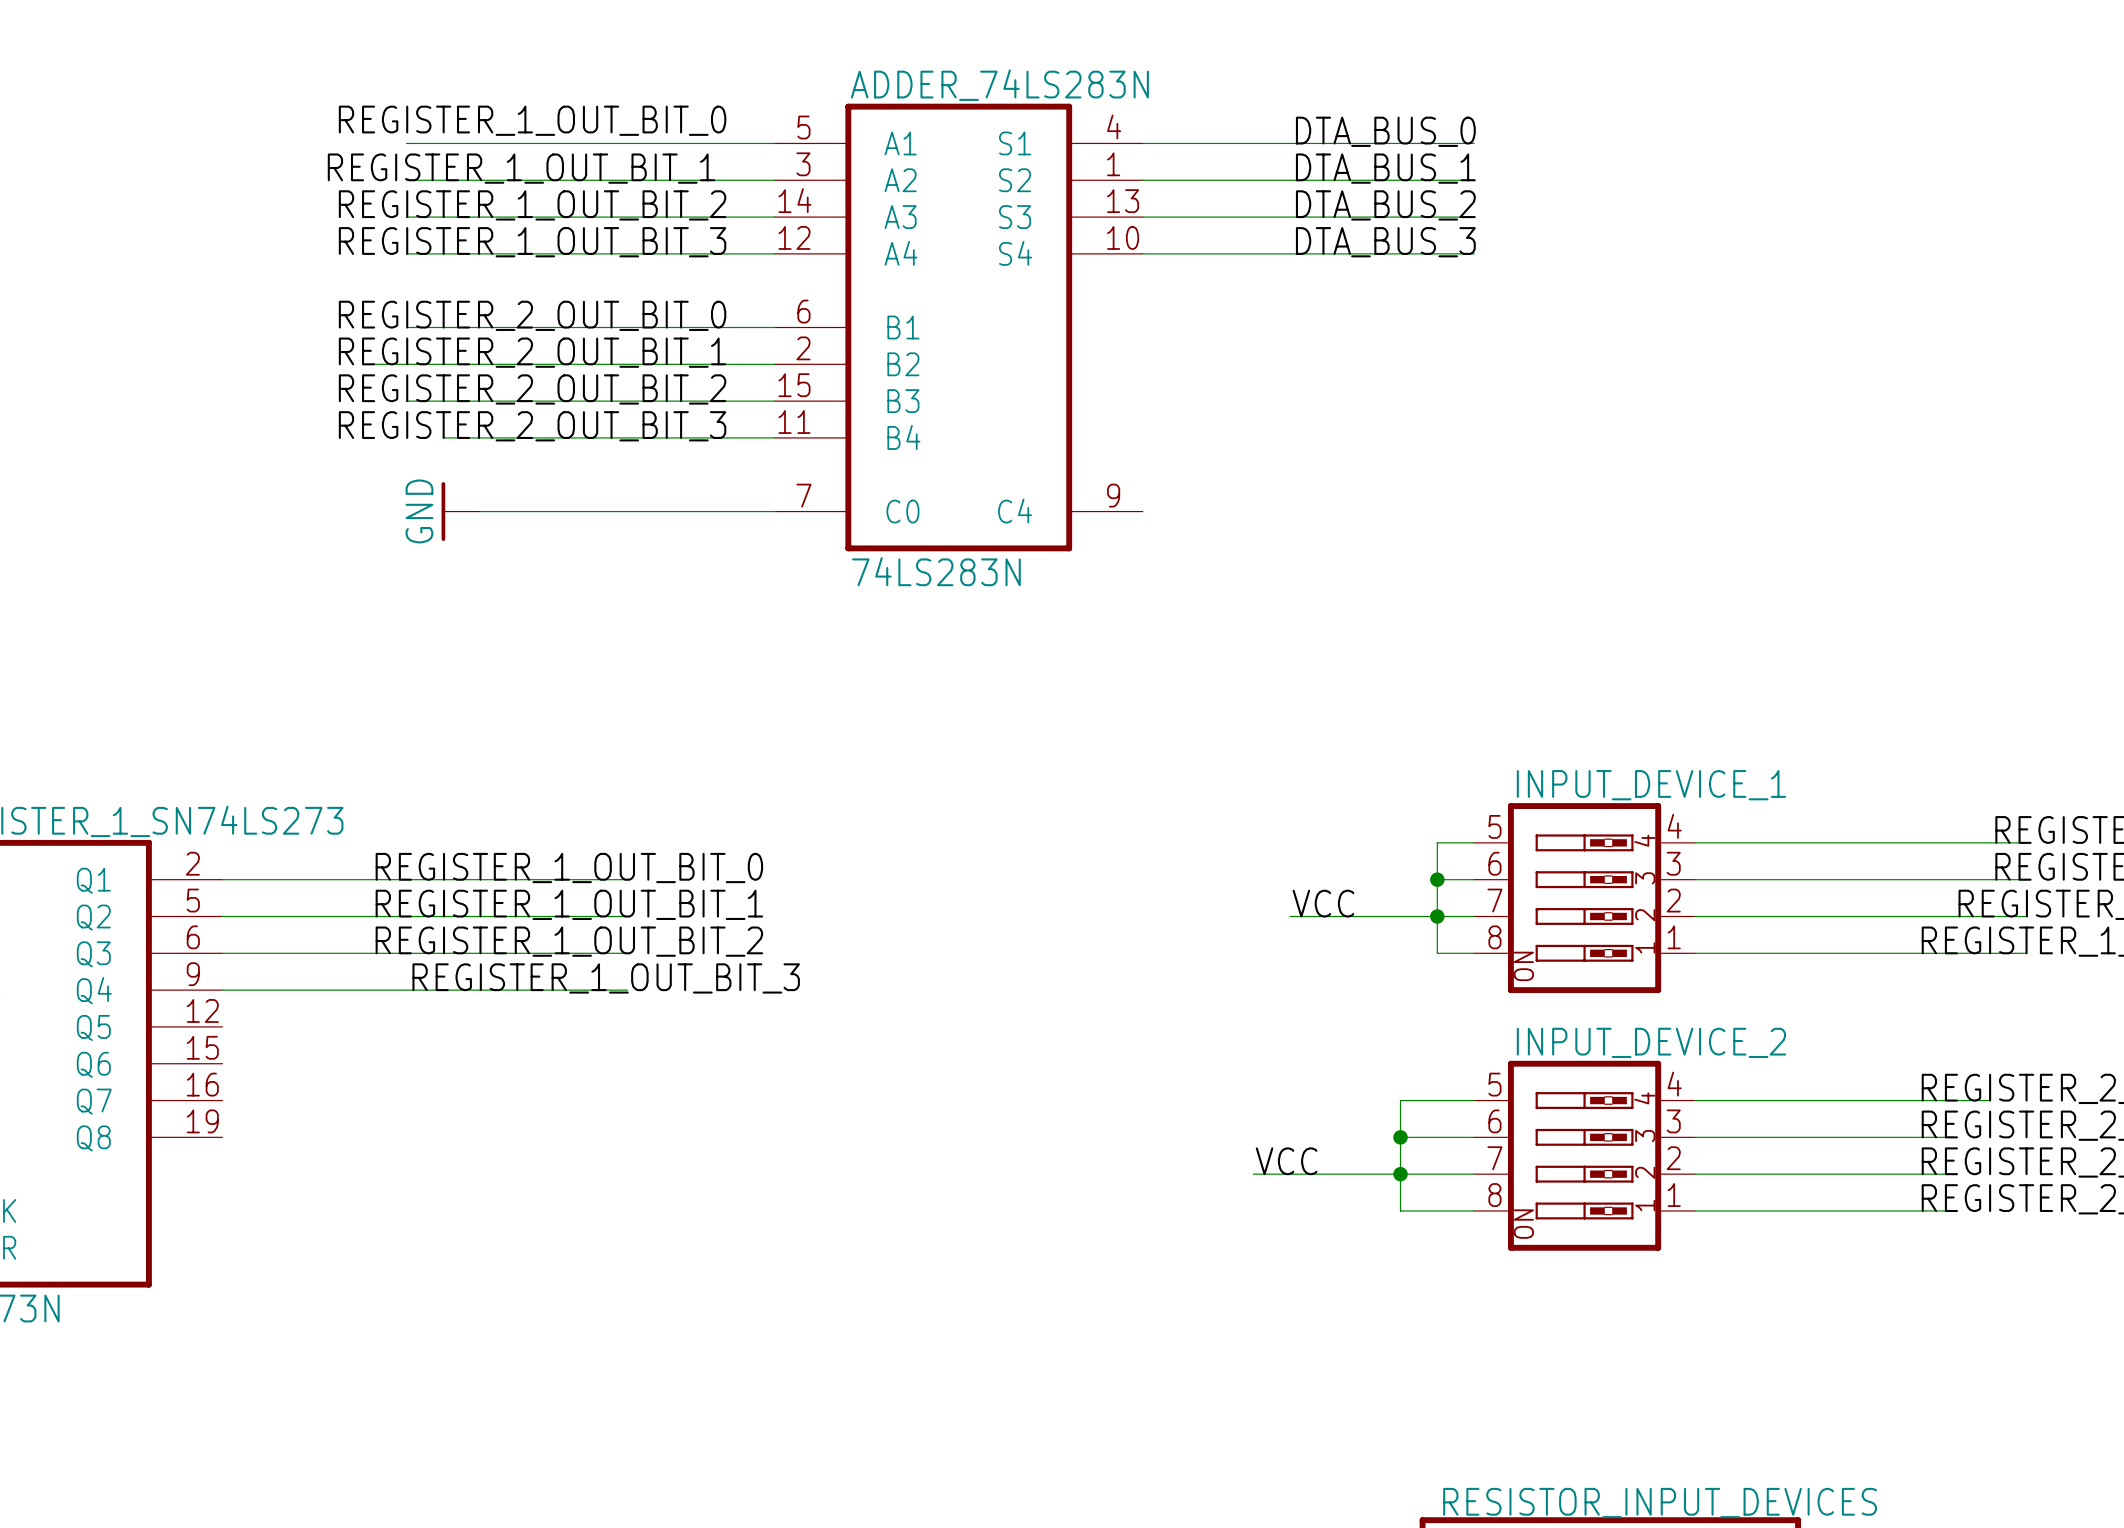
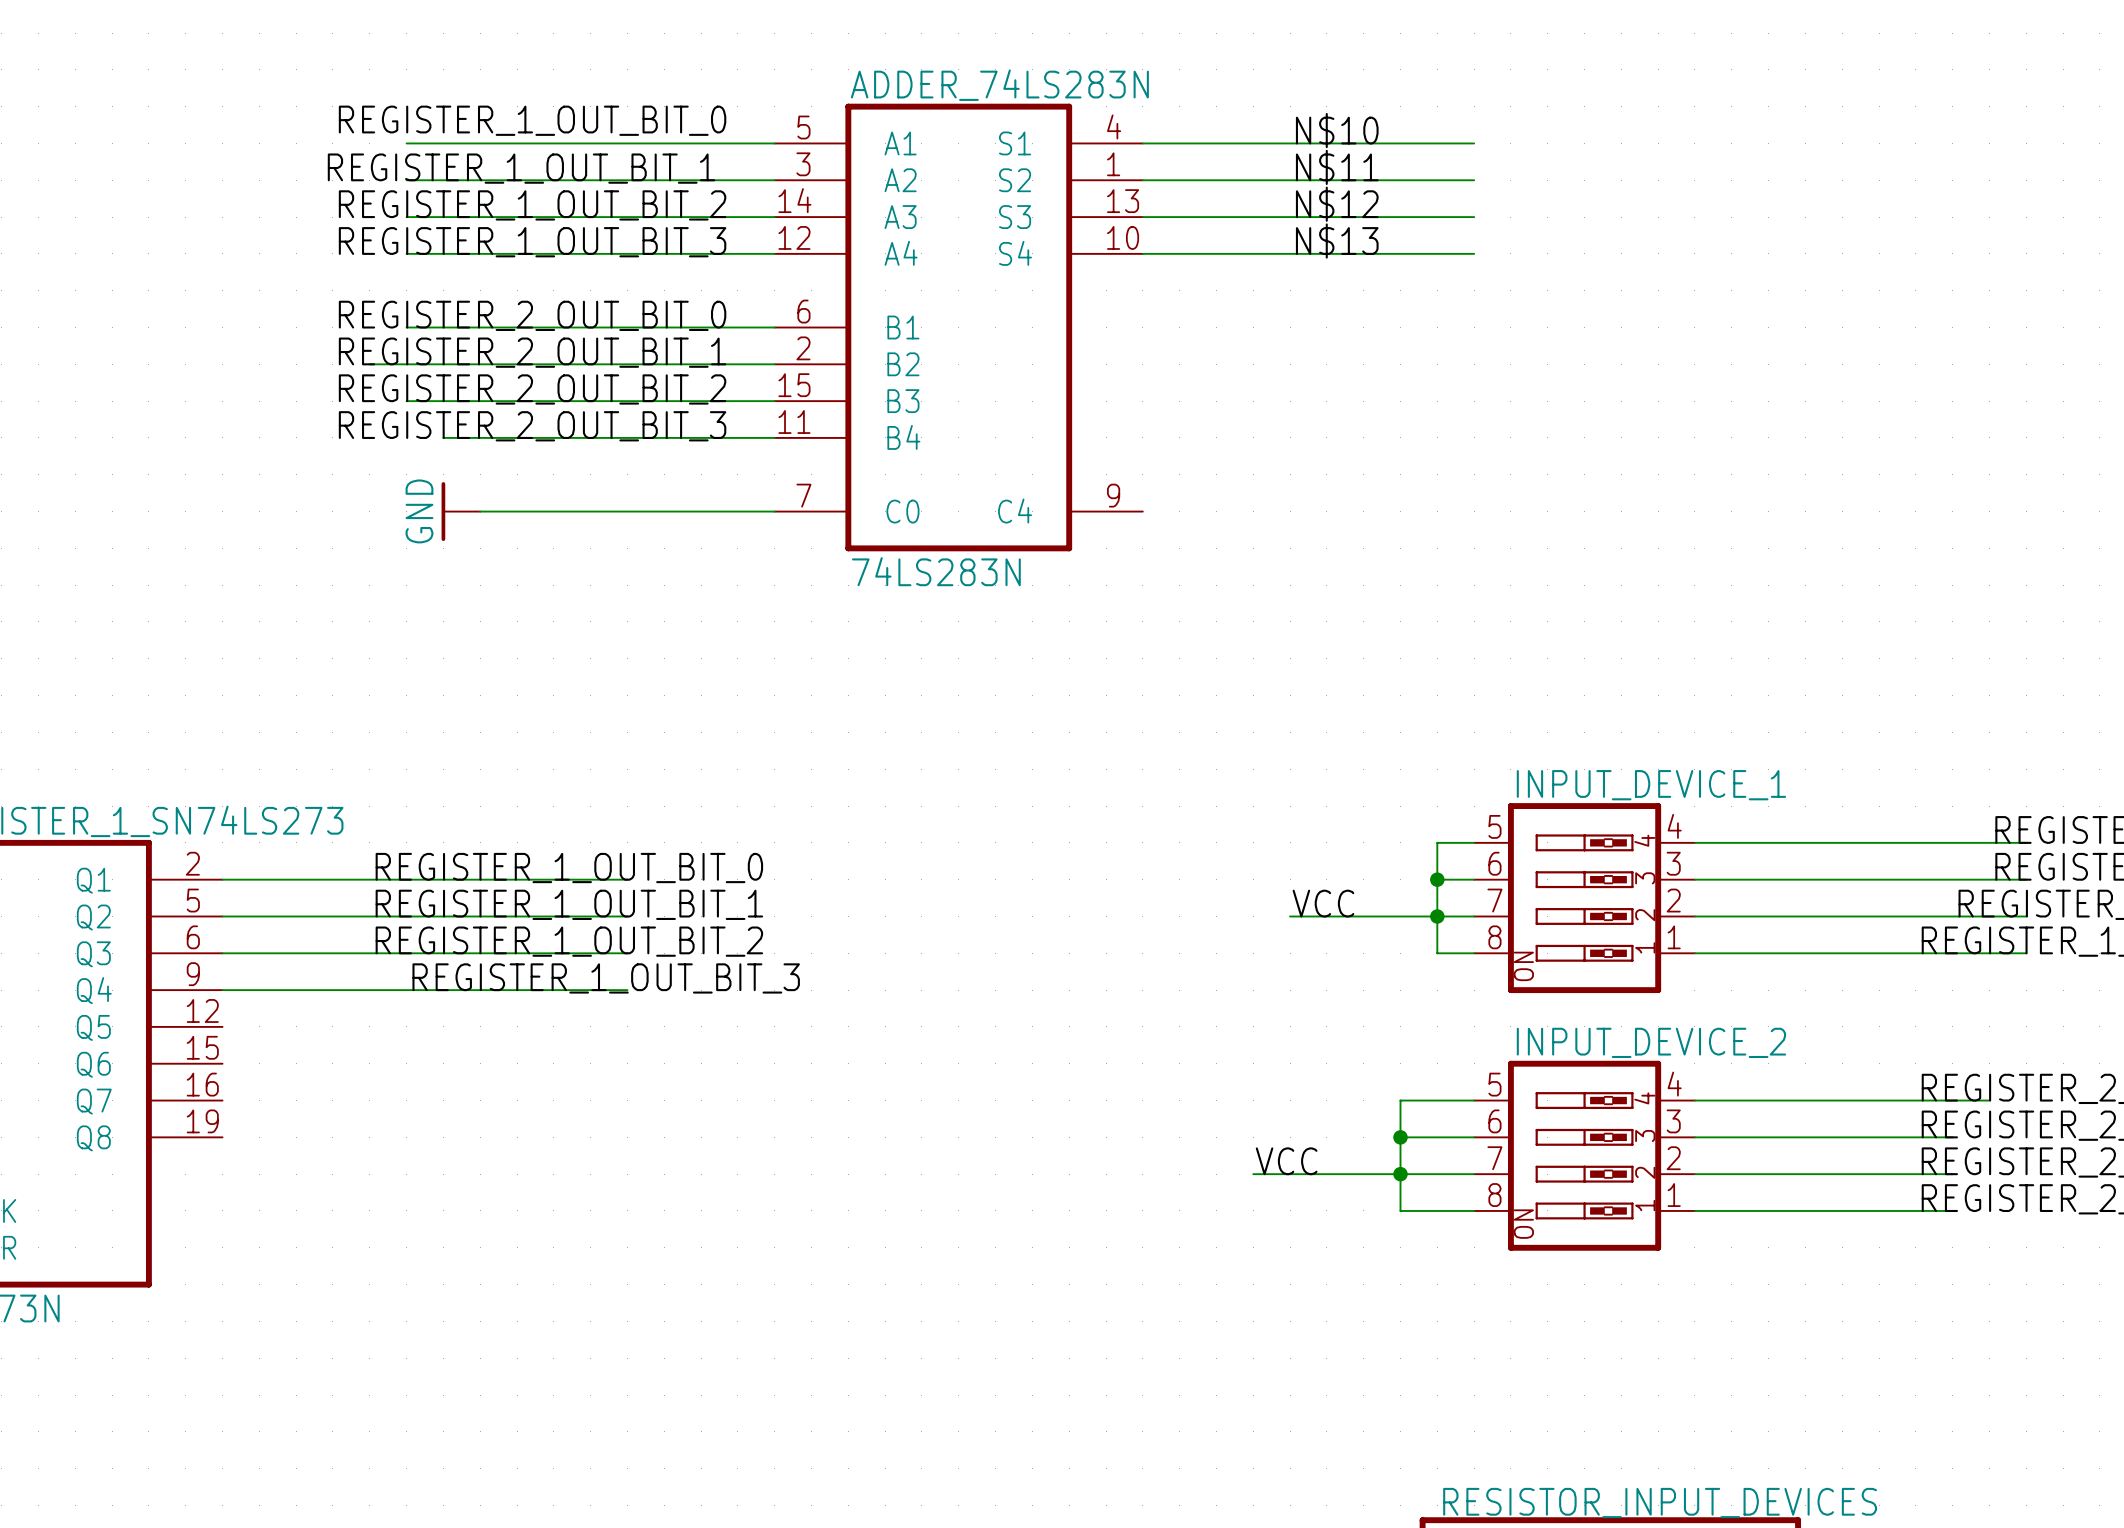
label: DTA_BUS_0 (1385, 131) -> N$10 (1337, 130)
label: DTA_BUS_1 (1385, 168) -> N$11 (1337, 167)
label: DTA_BUS_2 (1385, 205) -> N$12 (1337, 204)
label: DTA_BUS_3 (1385, 242) -> N$13 (1337, 241)

